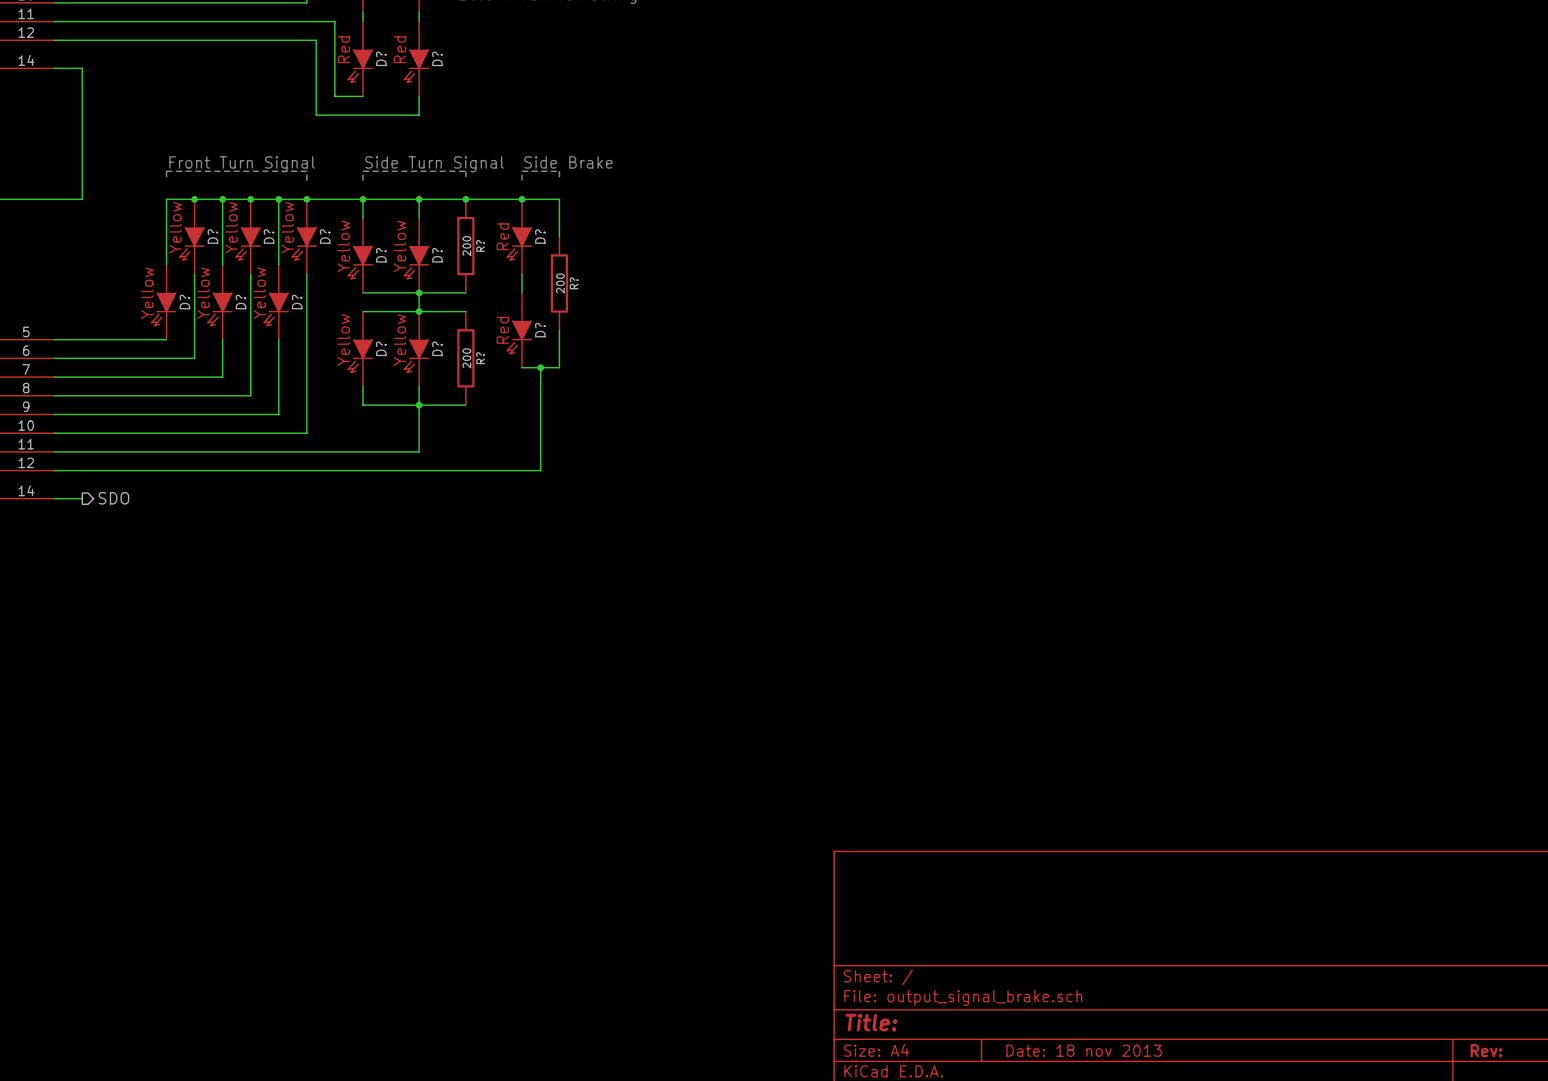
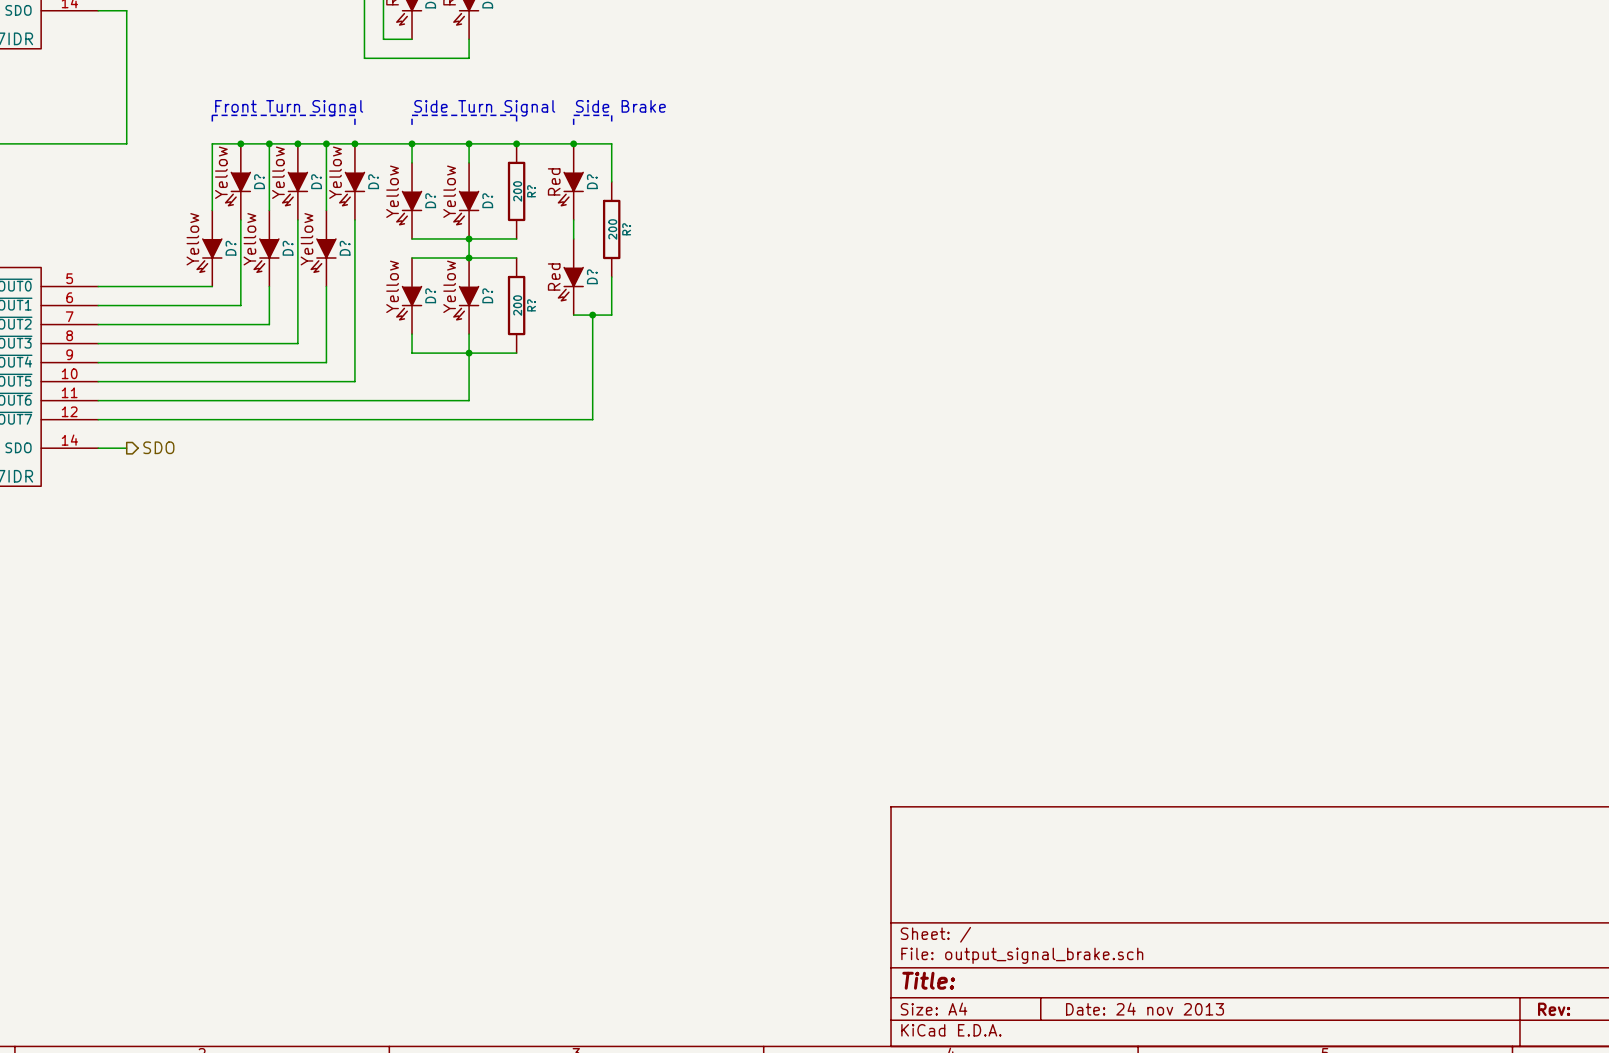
title block: Date: 18 nov 2013 (1084, 1050) -> Date: 24 nov 2013 (1145, 1009)

